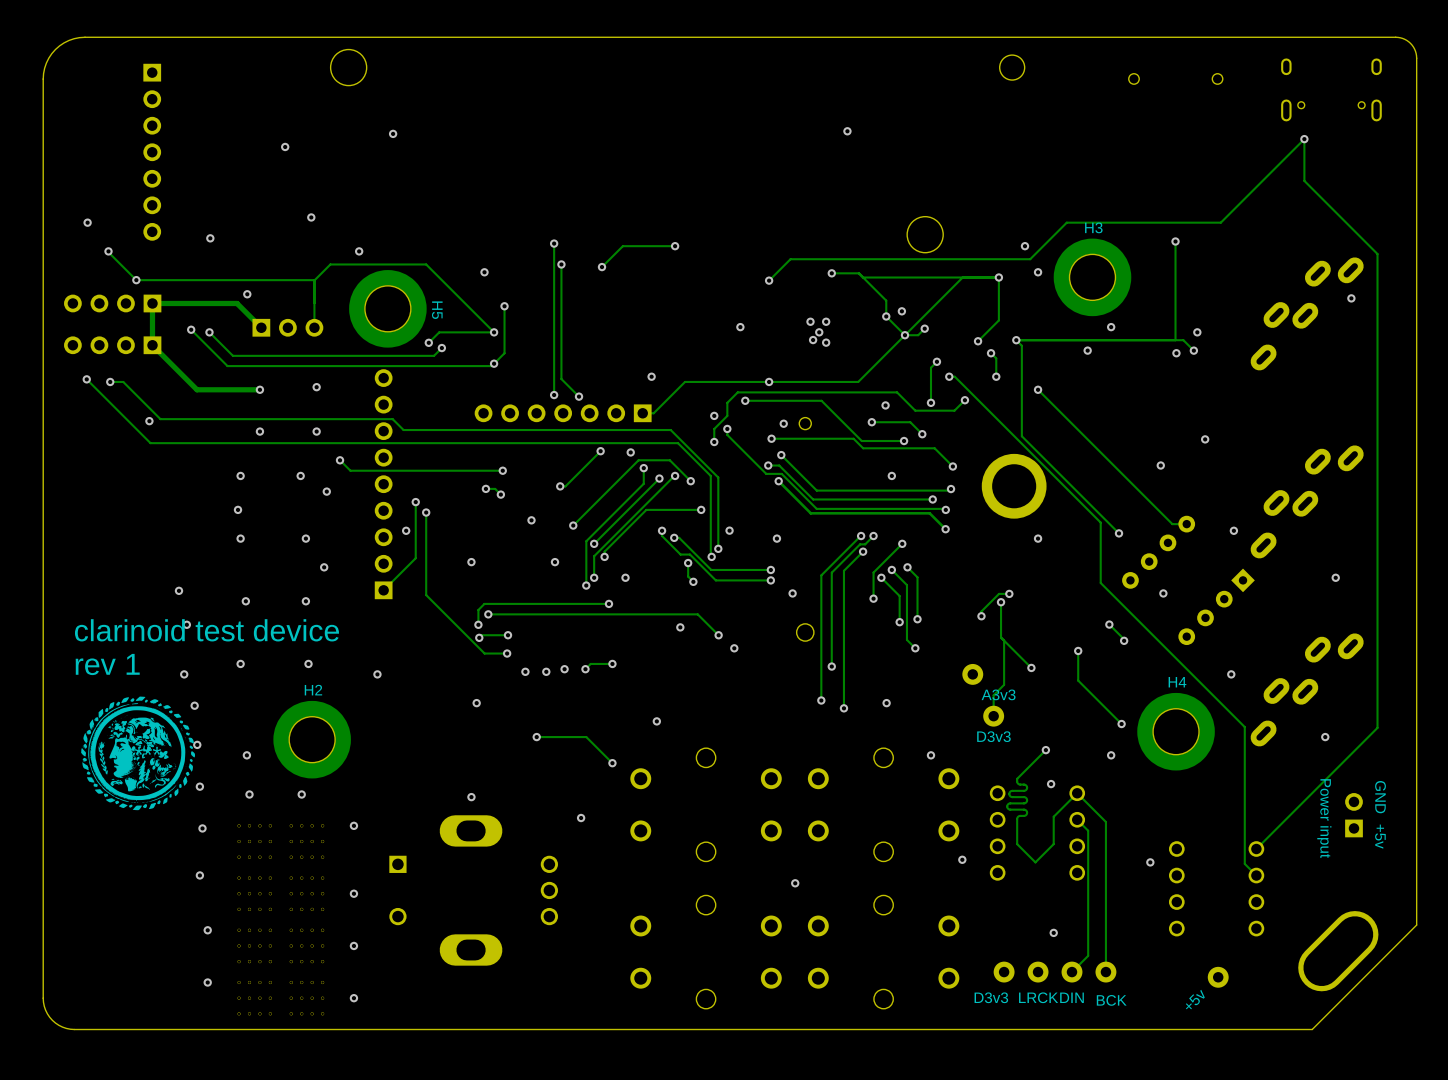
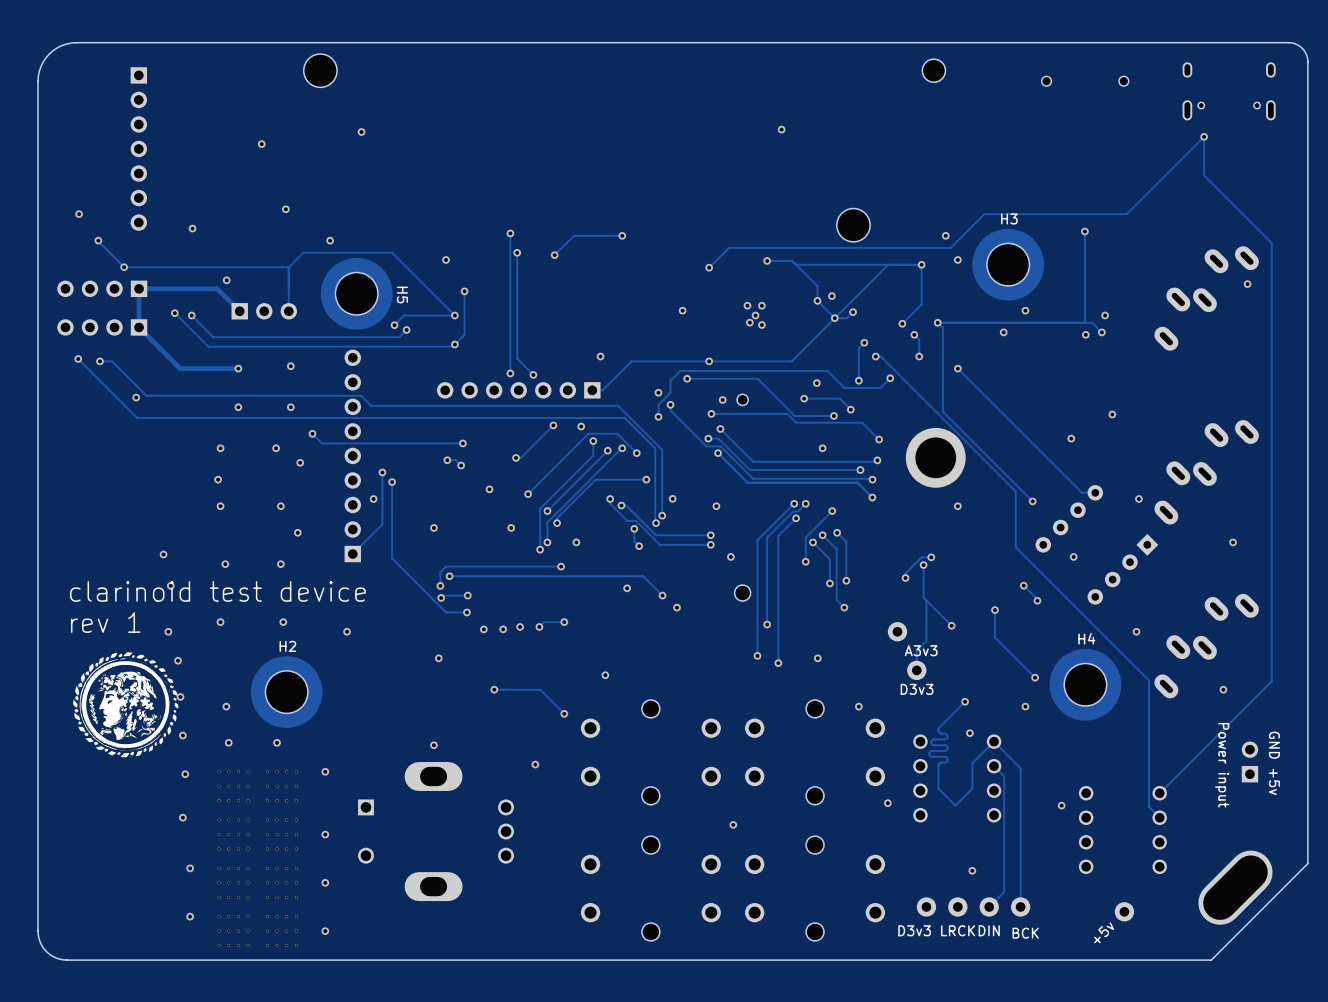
part footprint: [1250, 257, 1364, 371] -> [1154, 246, 1259, 351]
part footprint: [1250, 445, 1364, 559] -> [1154, 420, 1259, 525]
part footprint: [1250, 633, 1364, 747] -> [1154, 593, 1259, 699]

